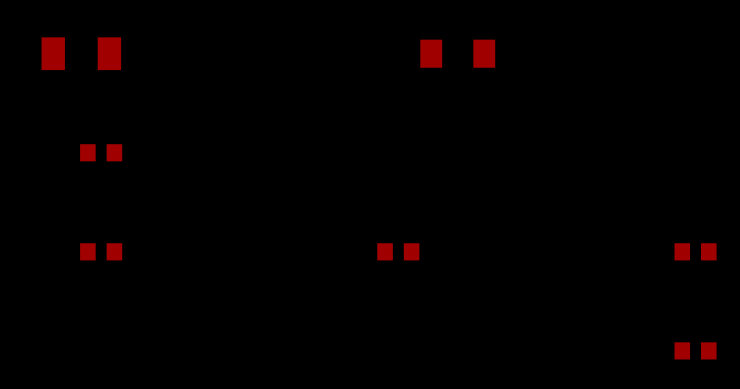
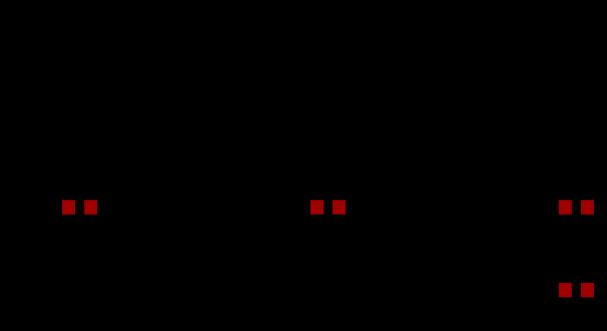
part: (81, 53) -> none
part: (457, 53) -> none
part: (101, 152) -> none

